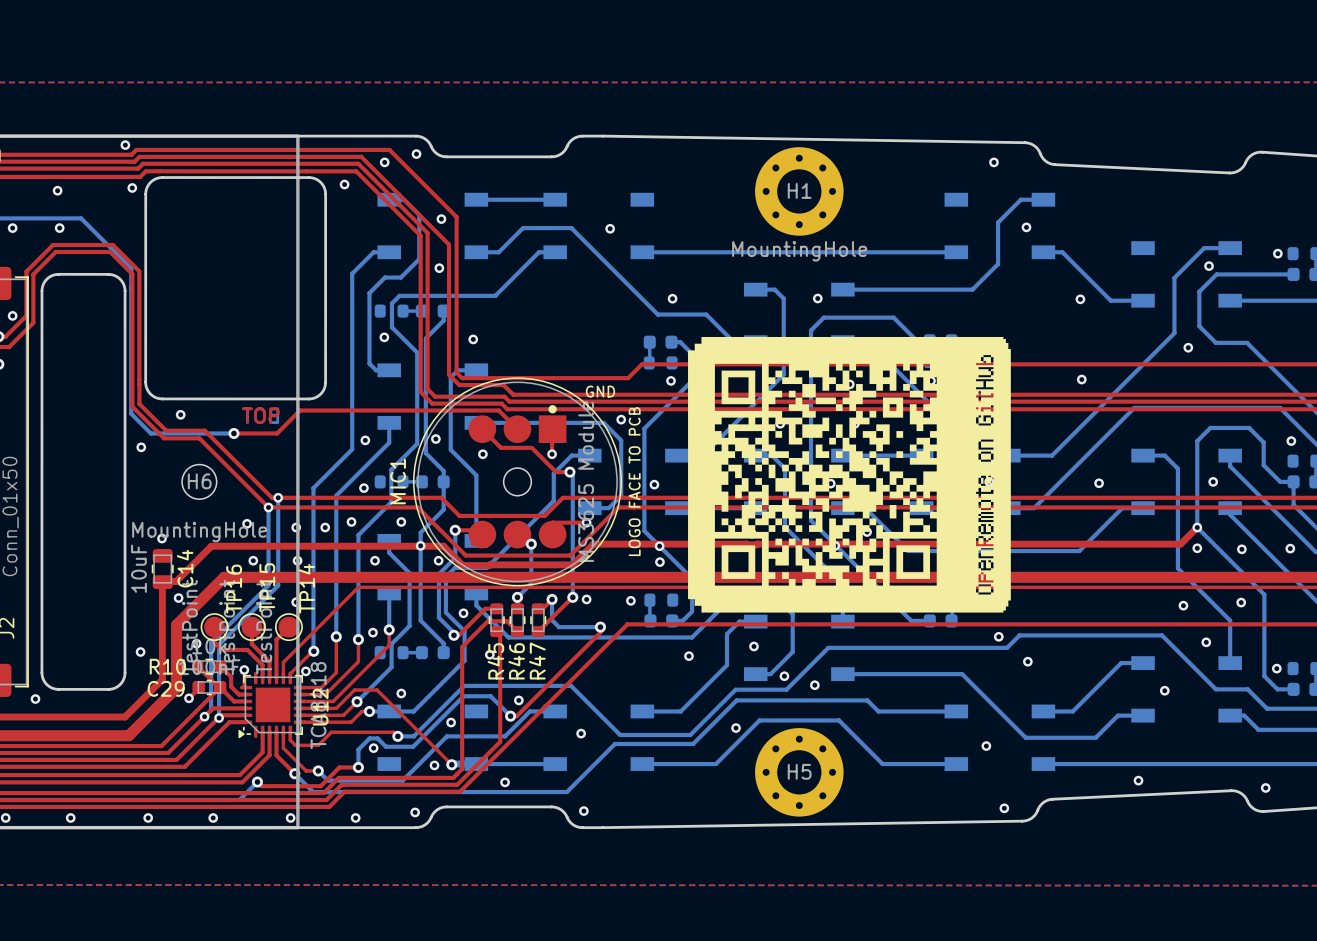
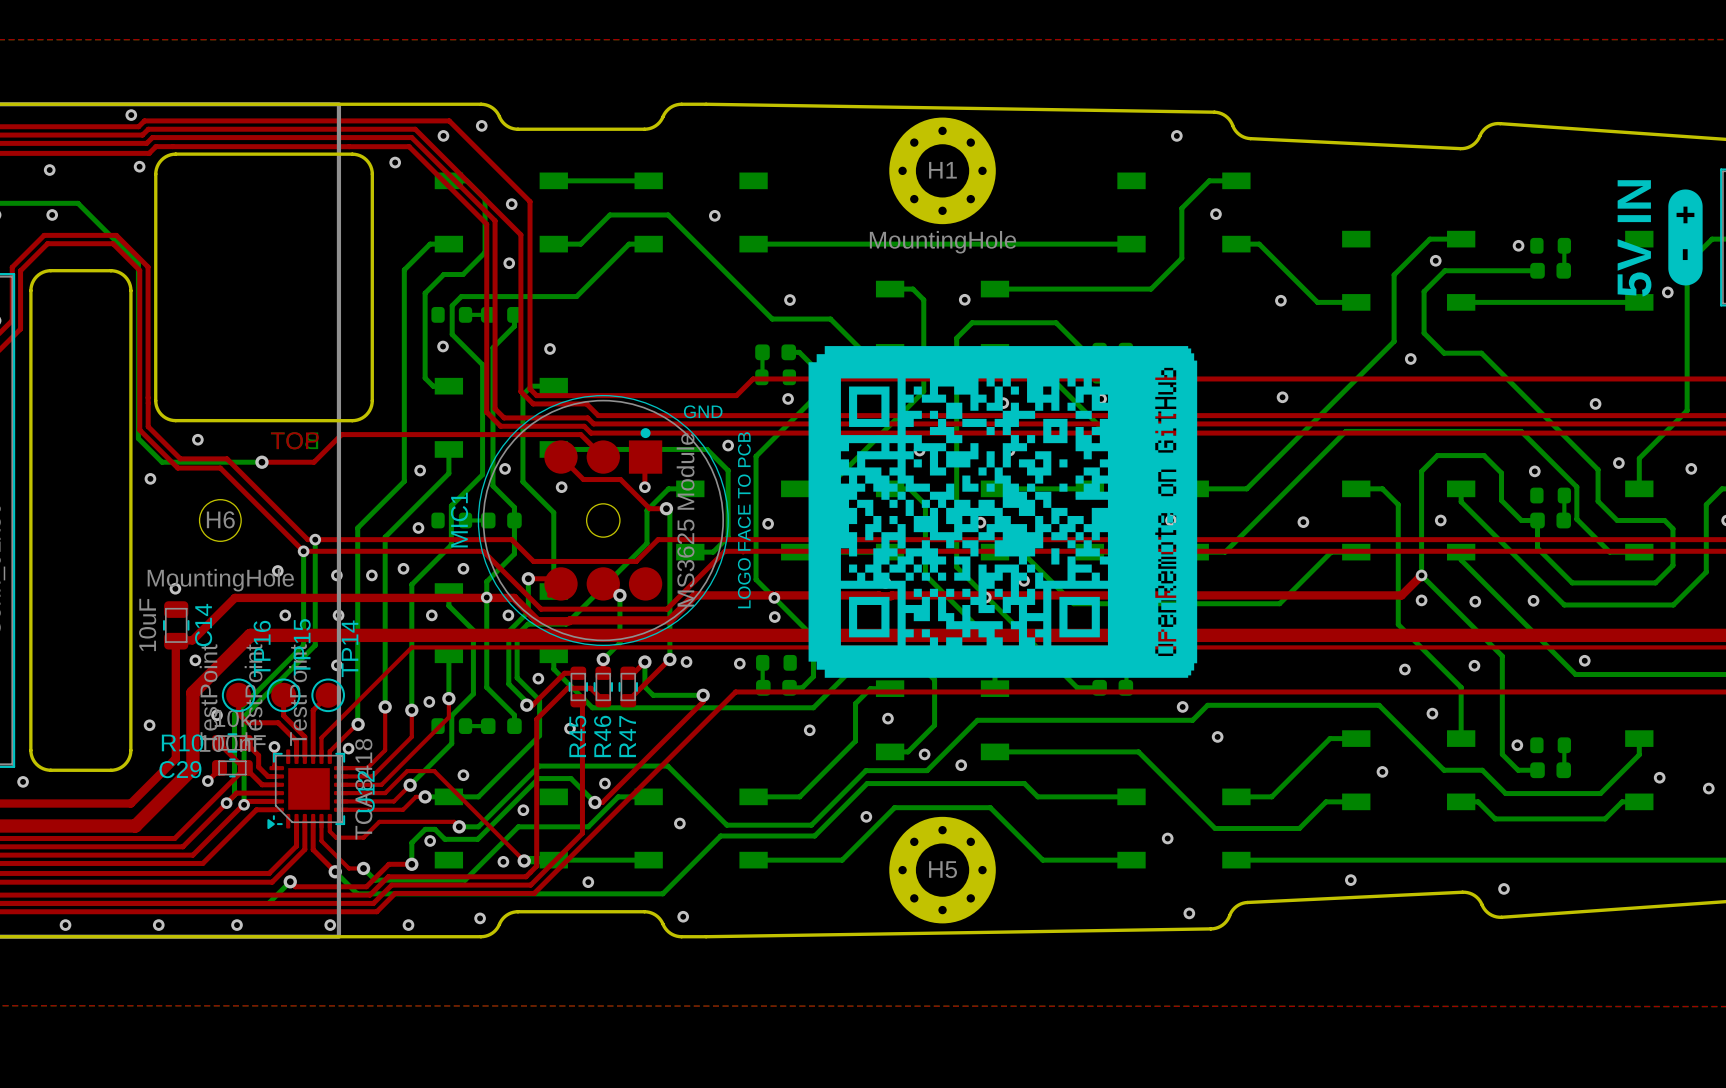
top track: (552, 522) (586, 522) -> none
via: (586, 522) -> none

